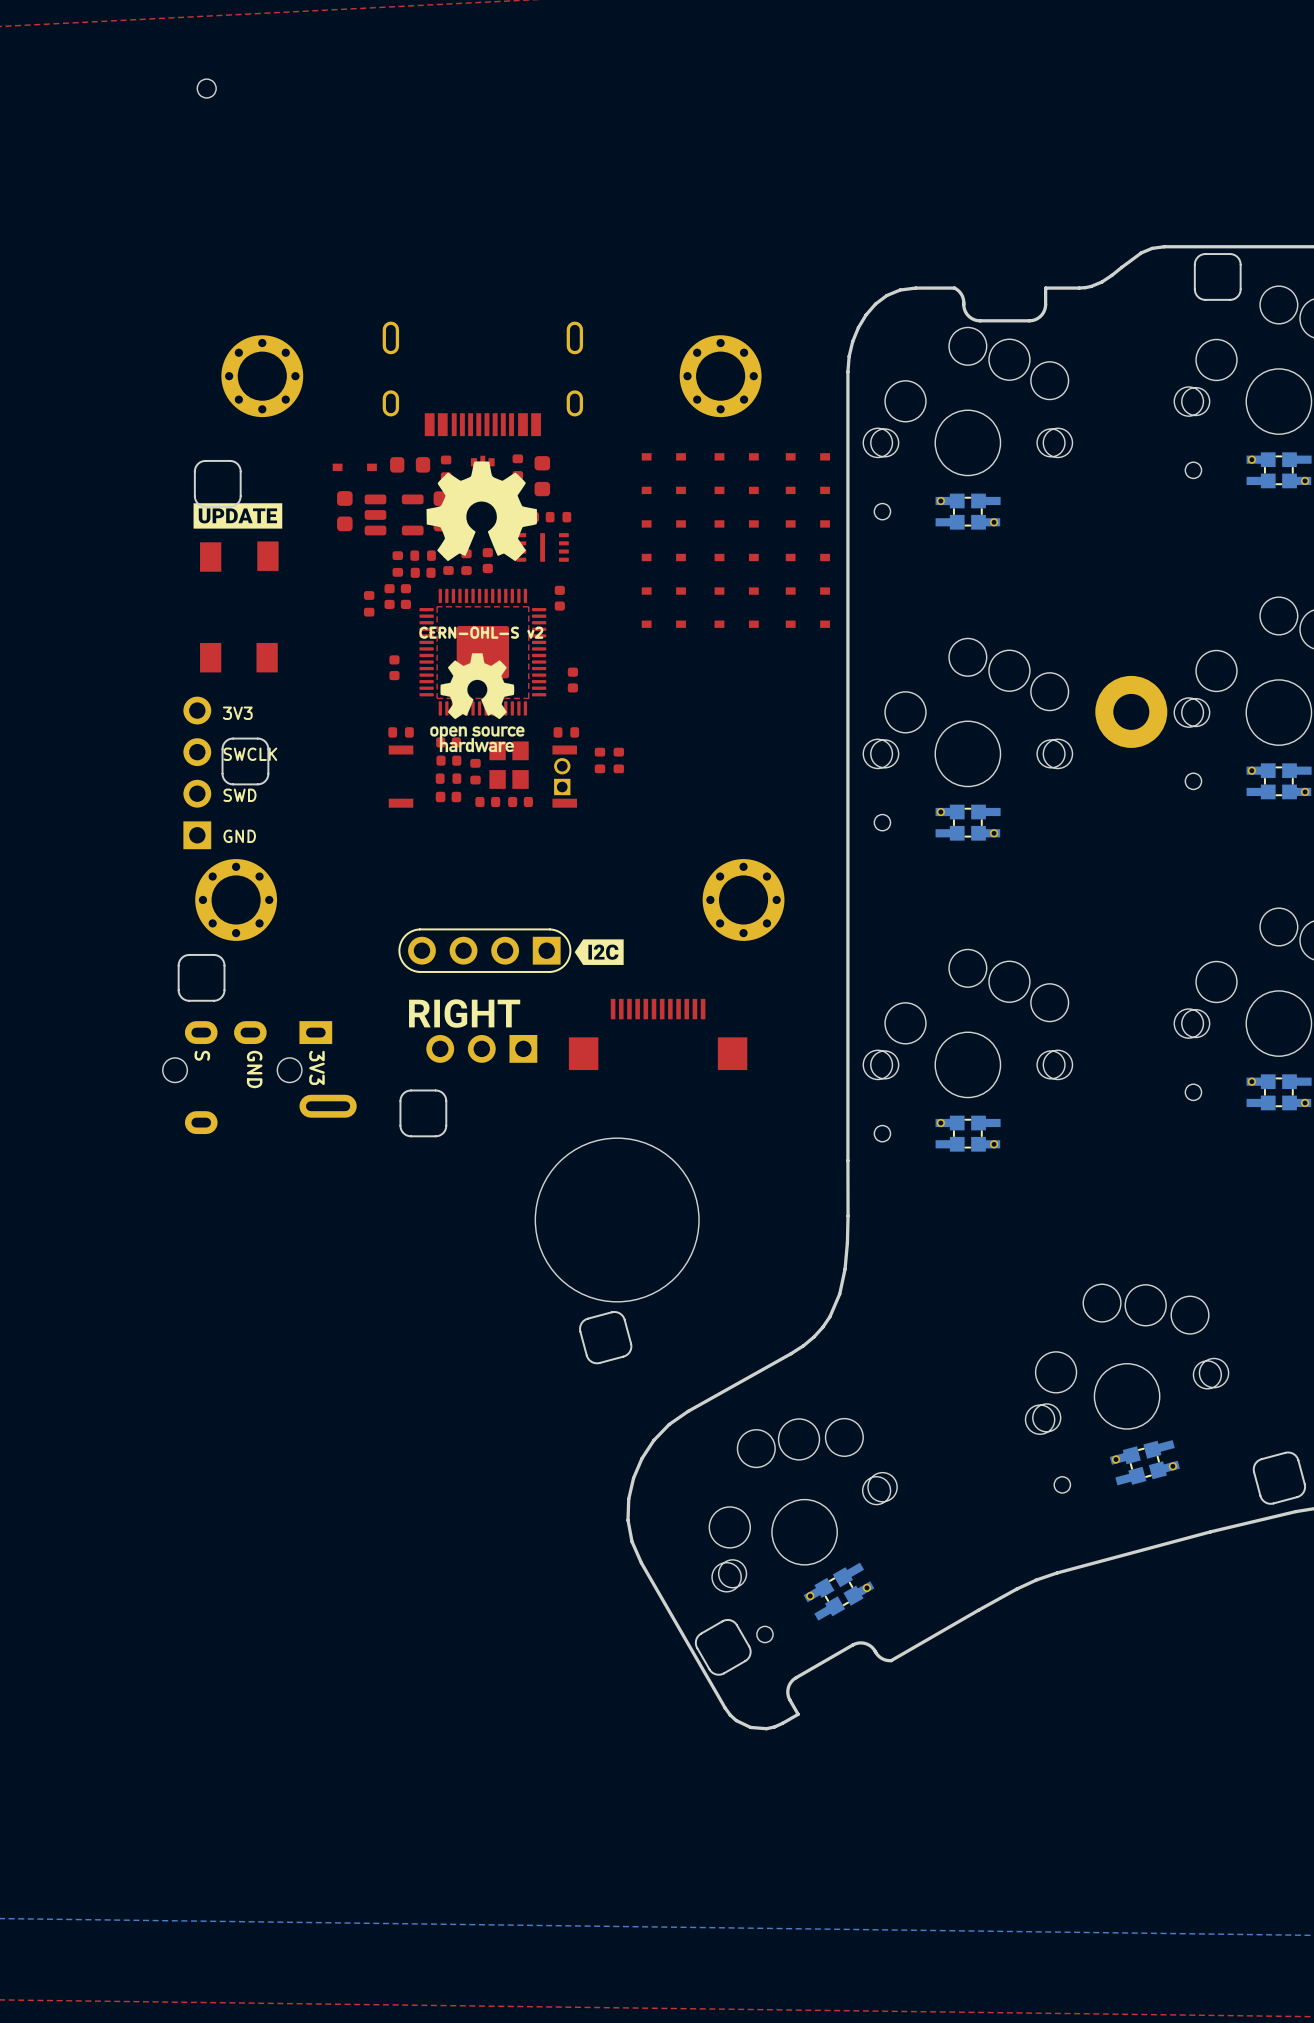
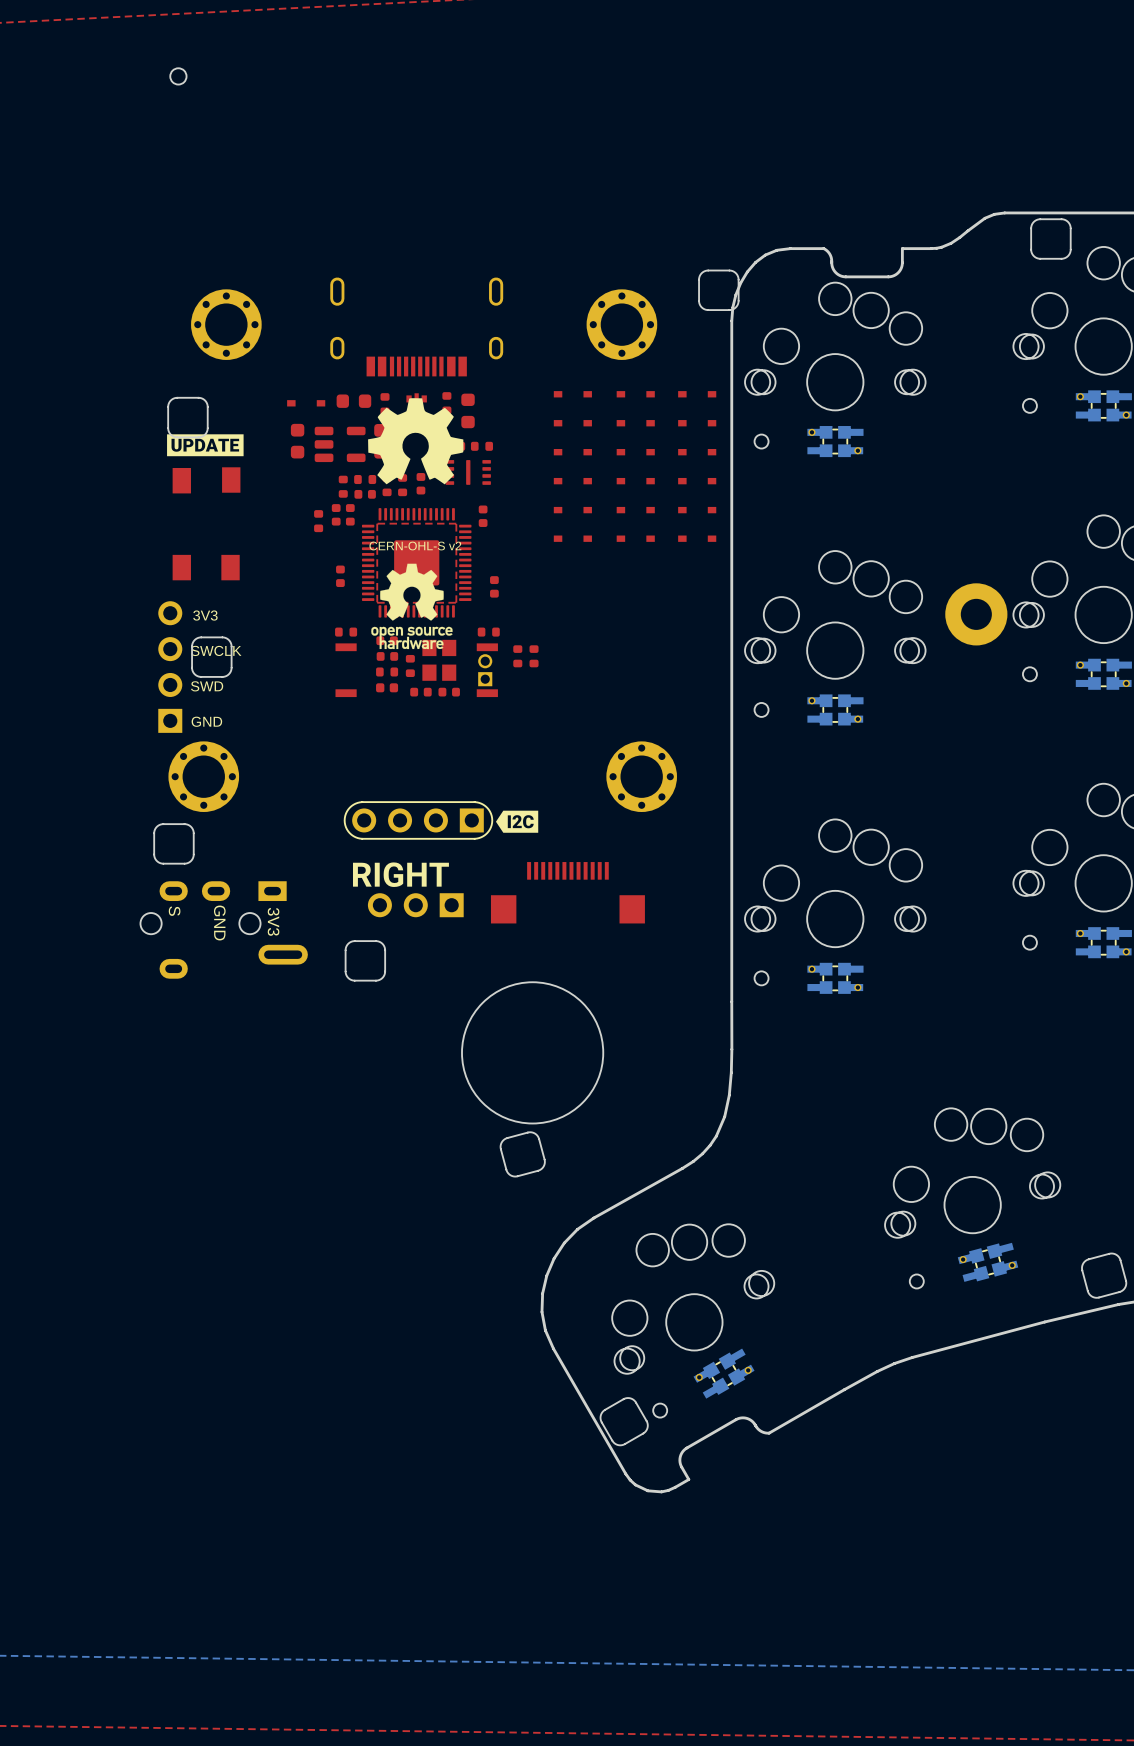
drawing: none -> [698, 269, 740, 311]

